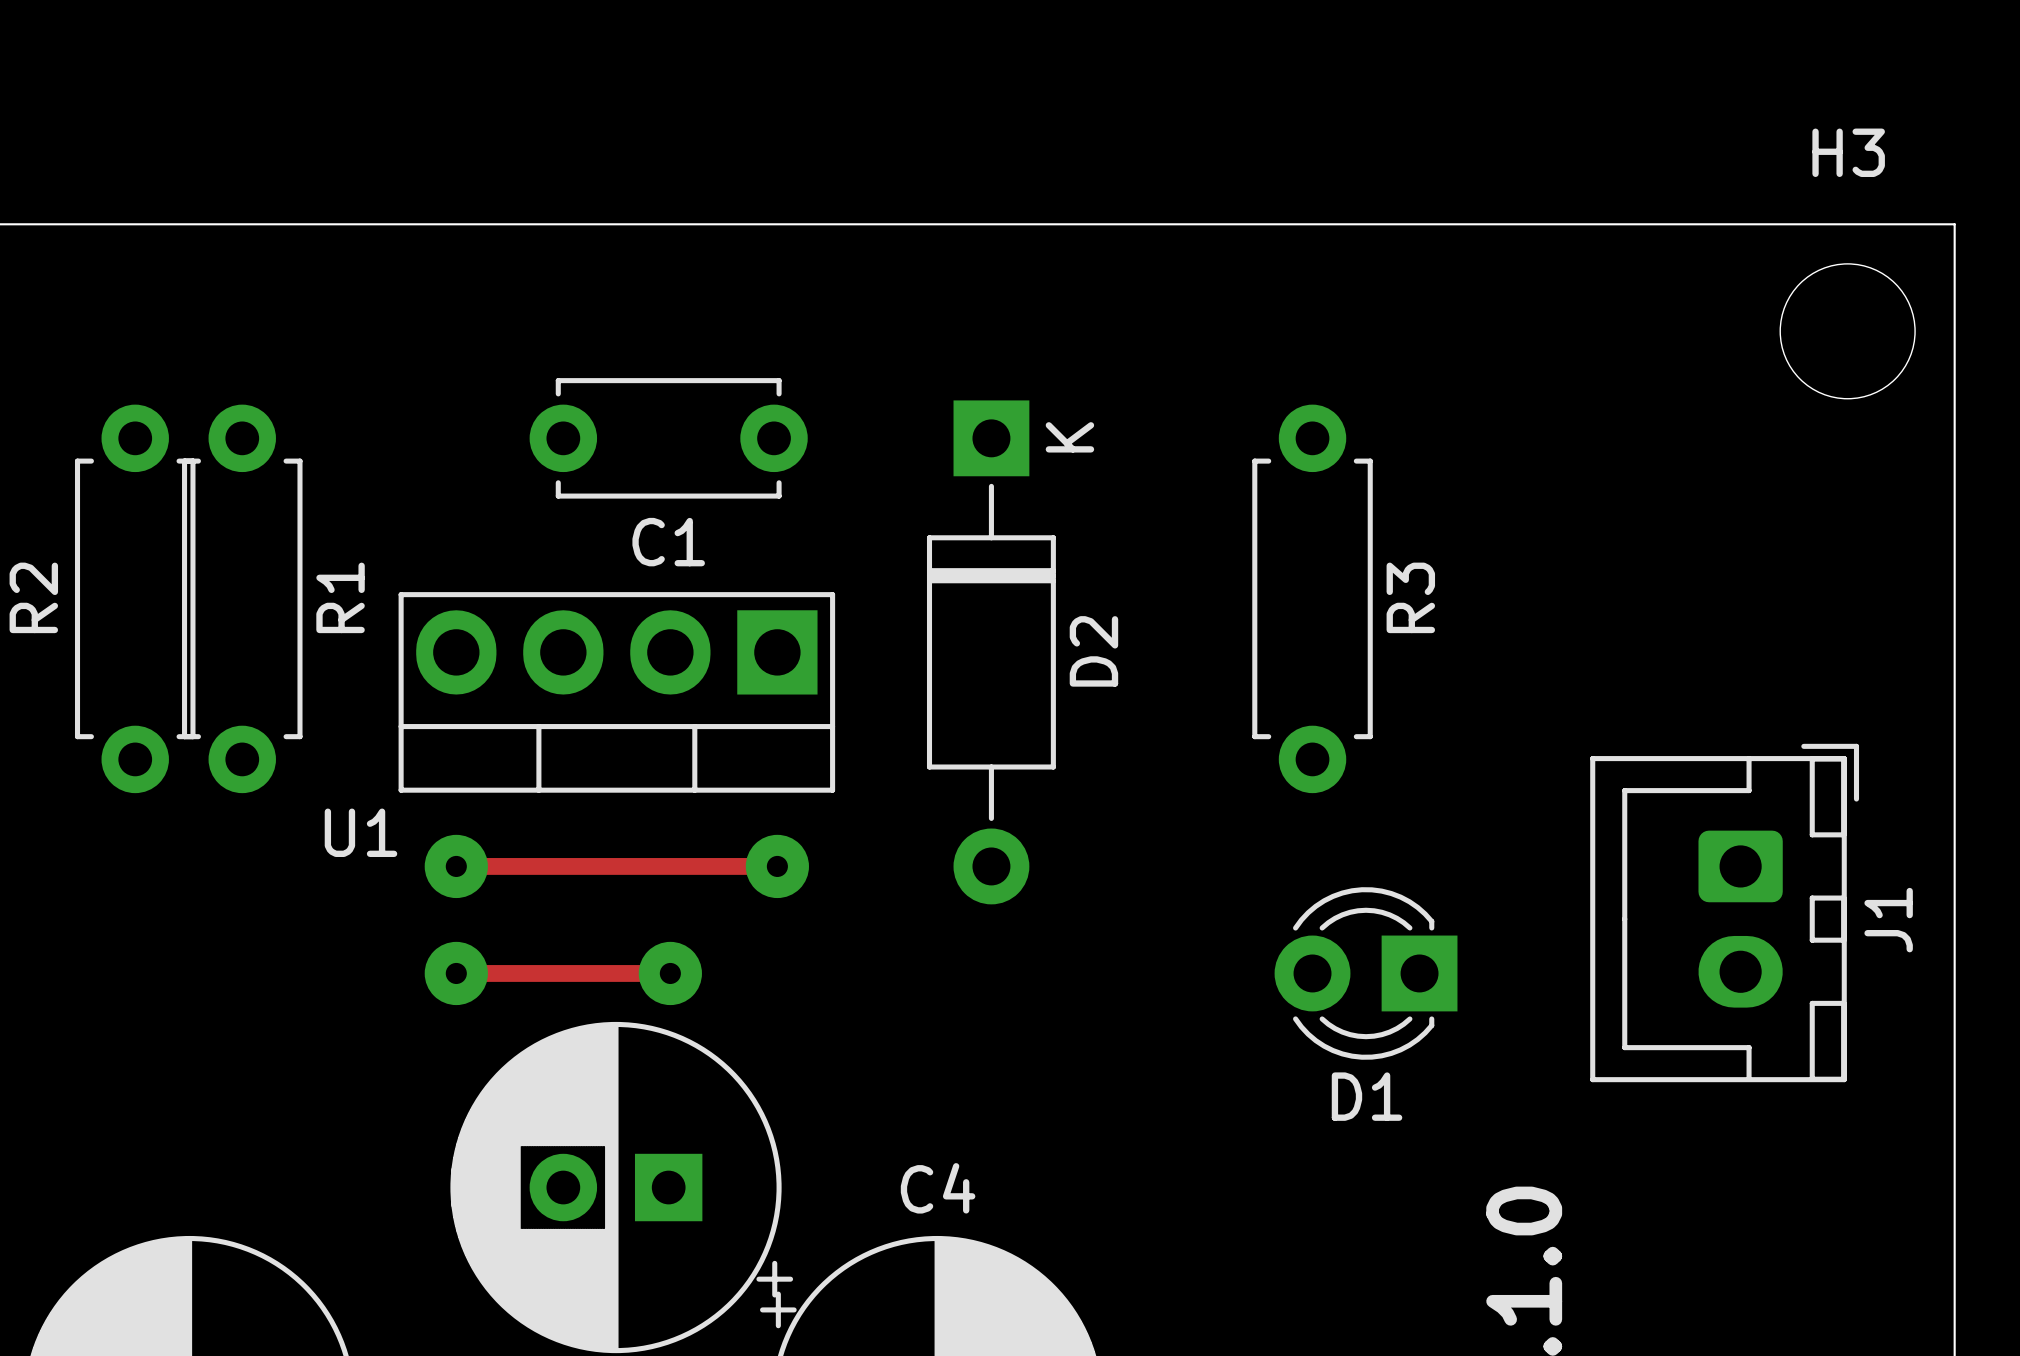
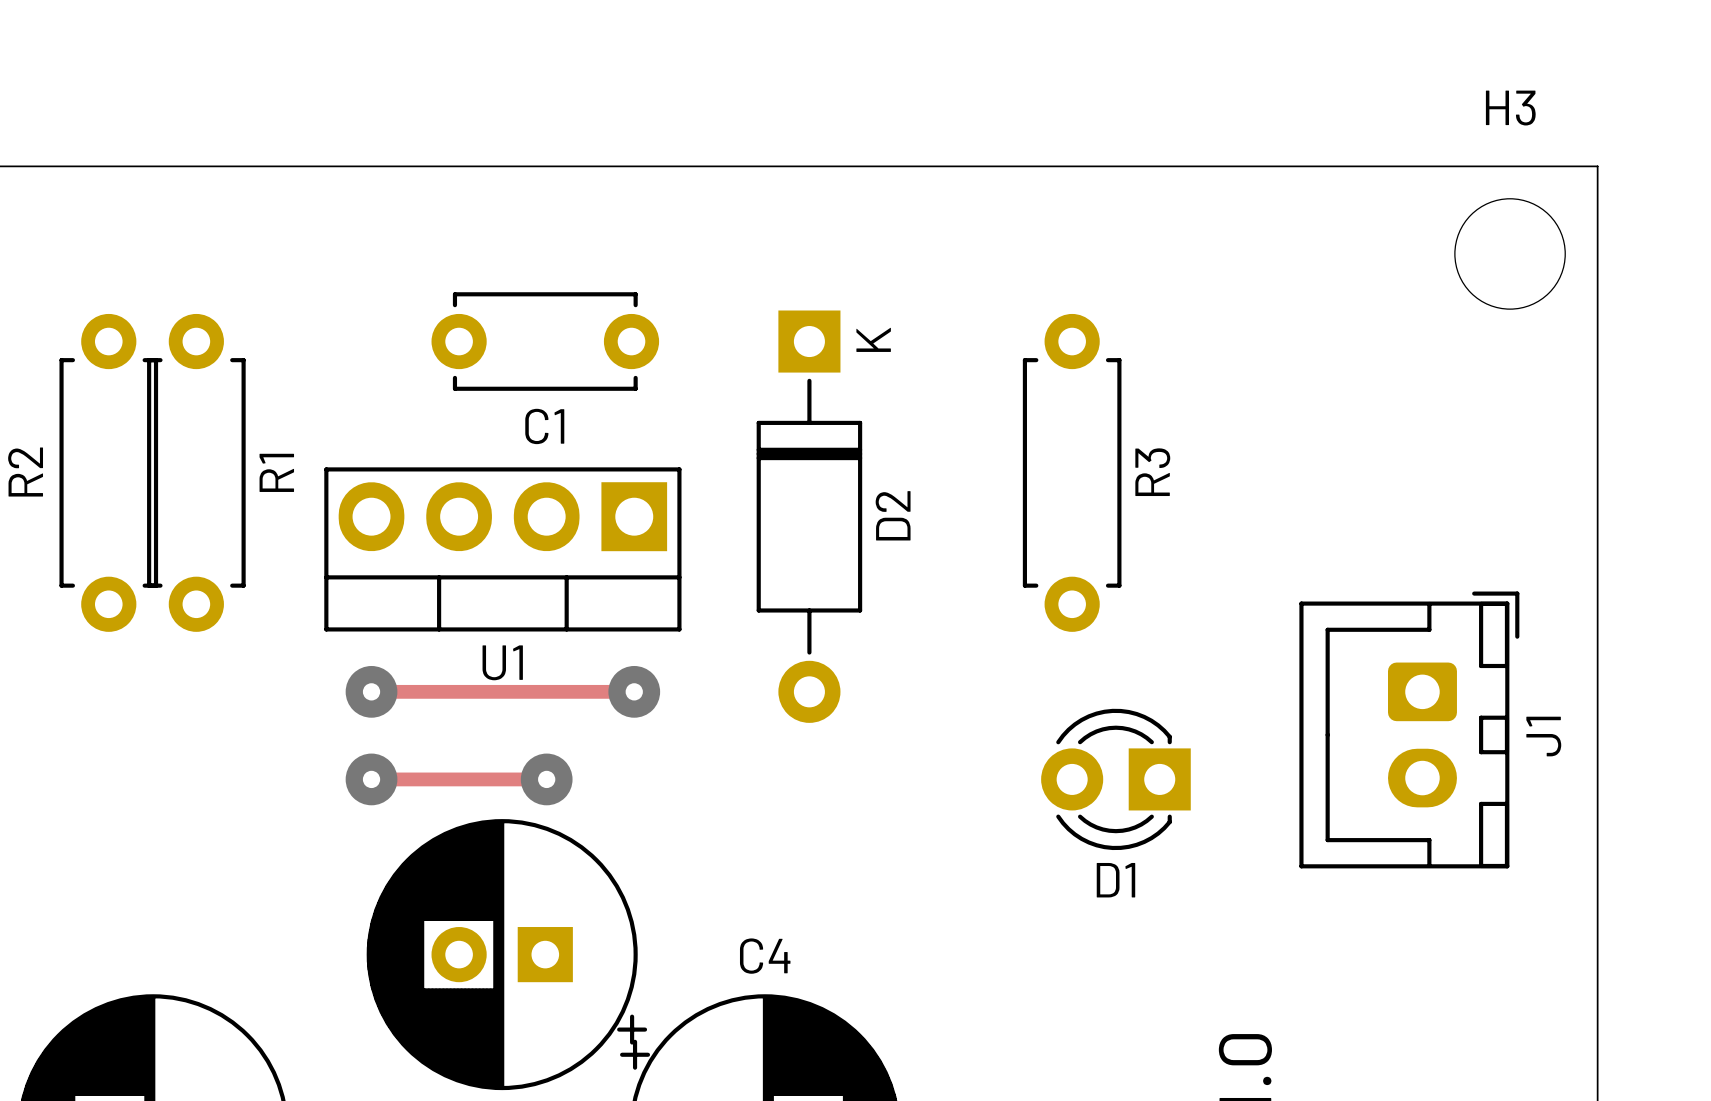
U1 name position: U1 (360, 832) -> U1 (502, 662)

